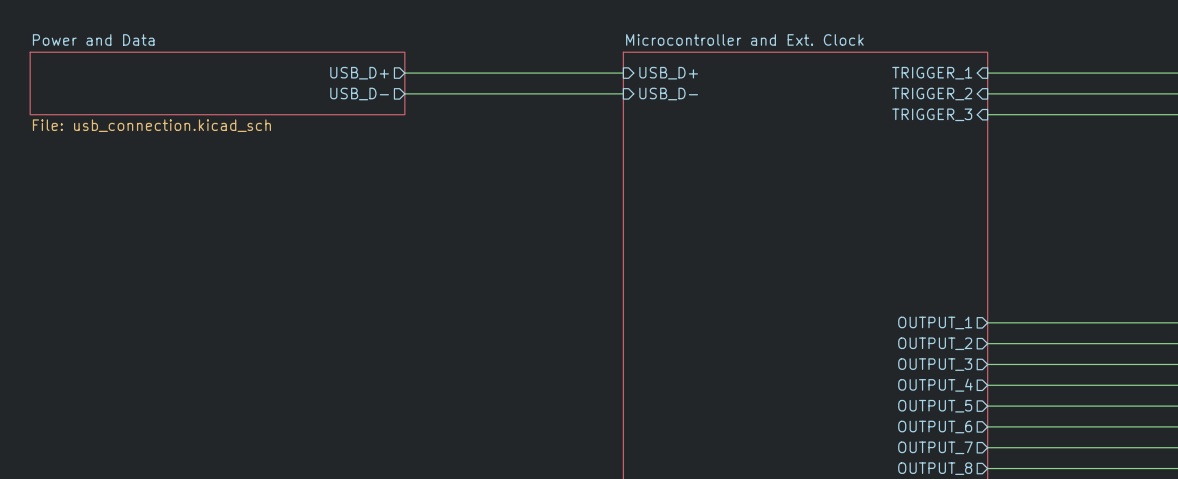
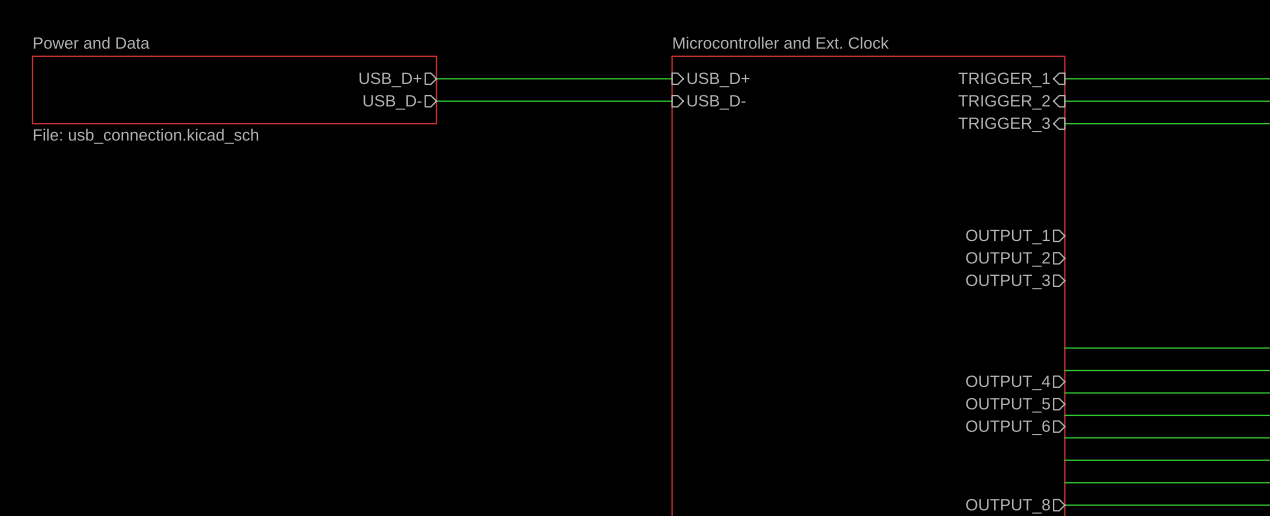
sheet pin position: OUTPUT_1 (935, 322) -> OUTPUT_1 (1007, 236)
sheet pin position: OUTPUT_2 (935, 343) -> OUTPUT_2 (1007, 259)
sheet pin position: OUTPUT_3 (935, 364) -> OUTPUT_3 (1008, 281)
sheet pin position: OUTPUT_4 (935, 385) -> OUTPUT_4 (1008, 382)
sheet pin position: OUTPUT_5 (935, 406) -> OUTPUT_5 (1008, 405)
sheet pin position: OUTPUT_6 (935, 427) -> OUTPUT_6 (1008, 427)
sheet pin: OUTPUT_7 (935, 447) -> none

